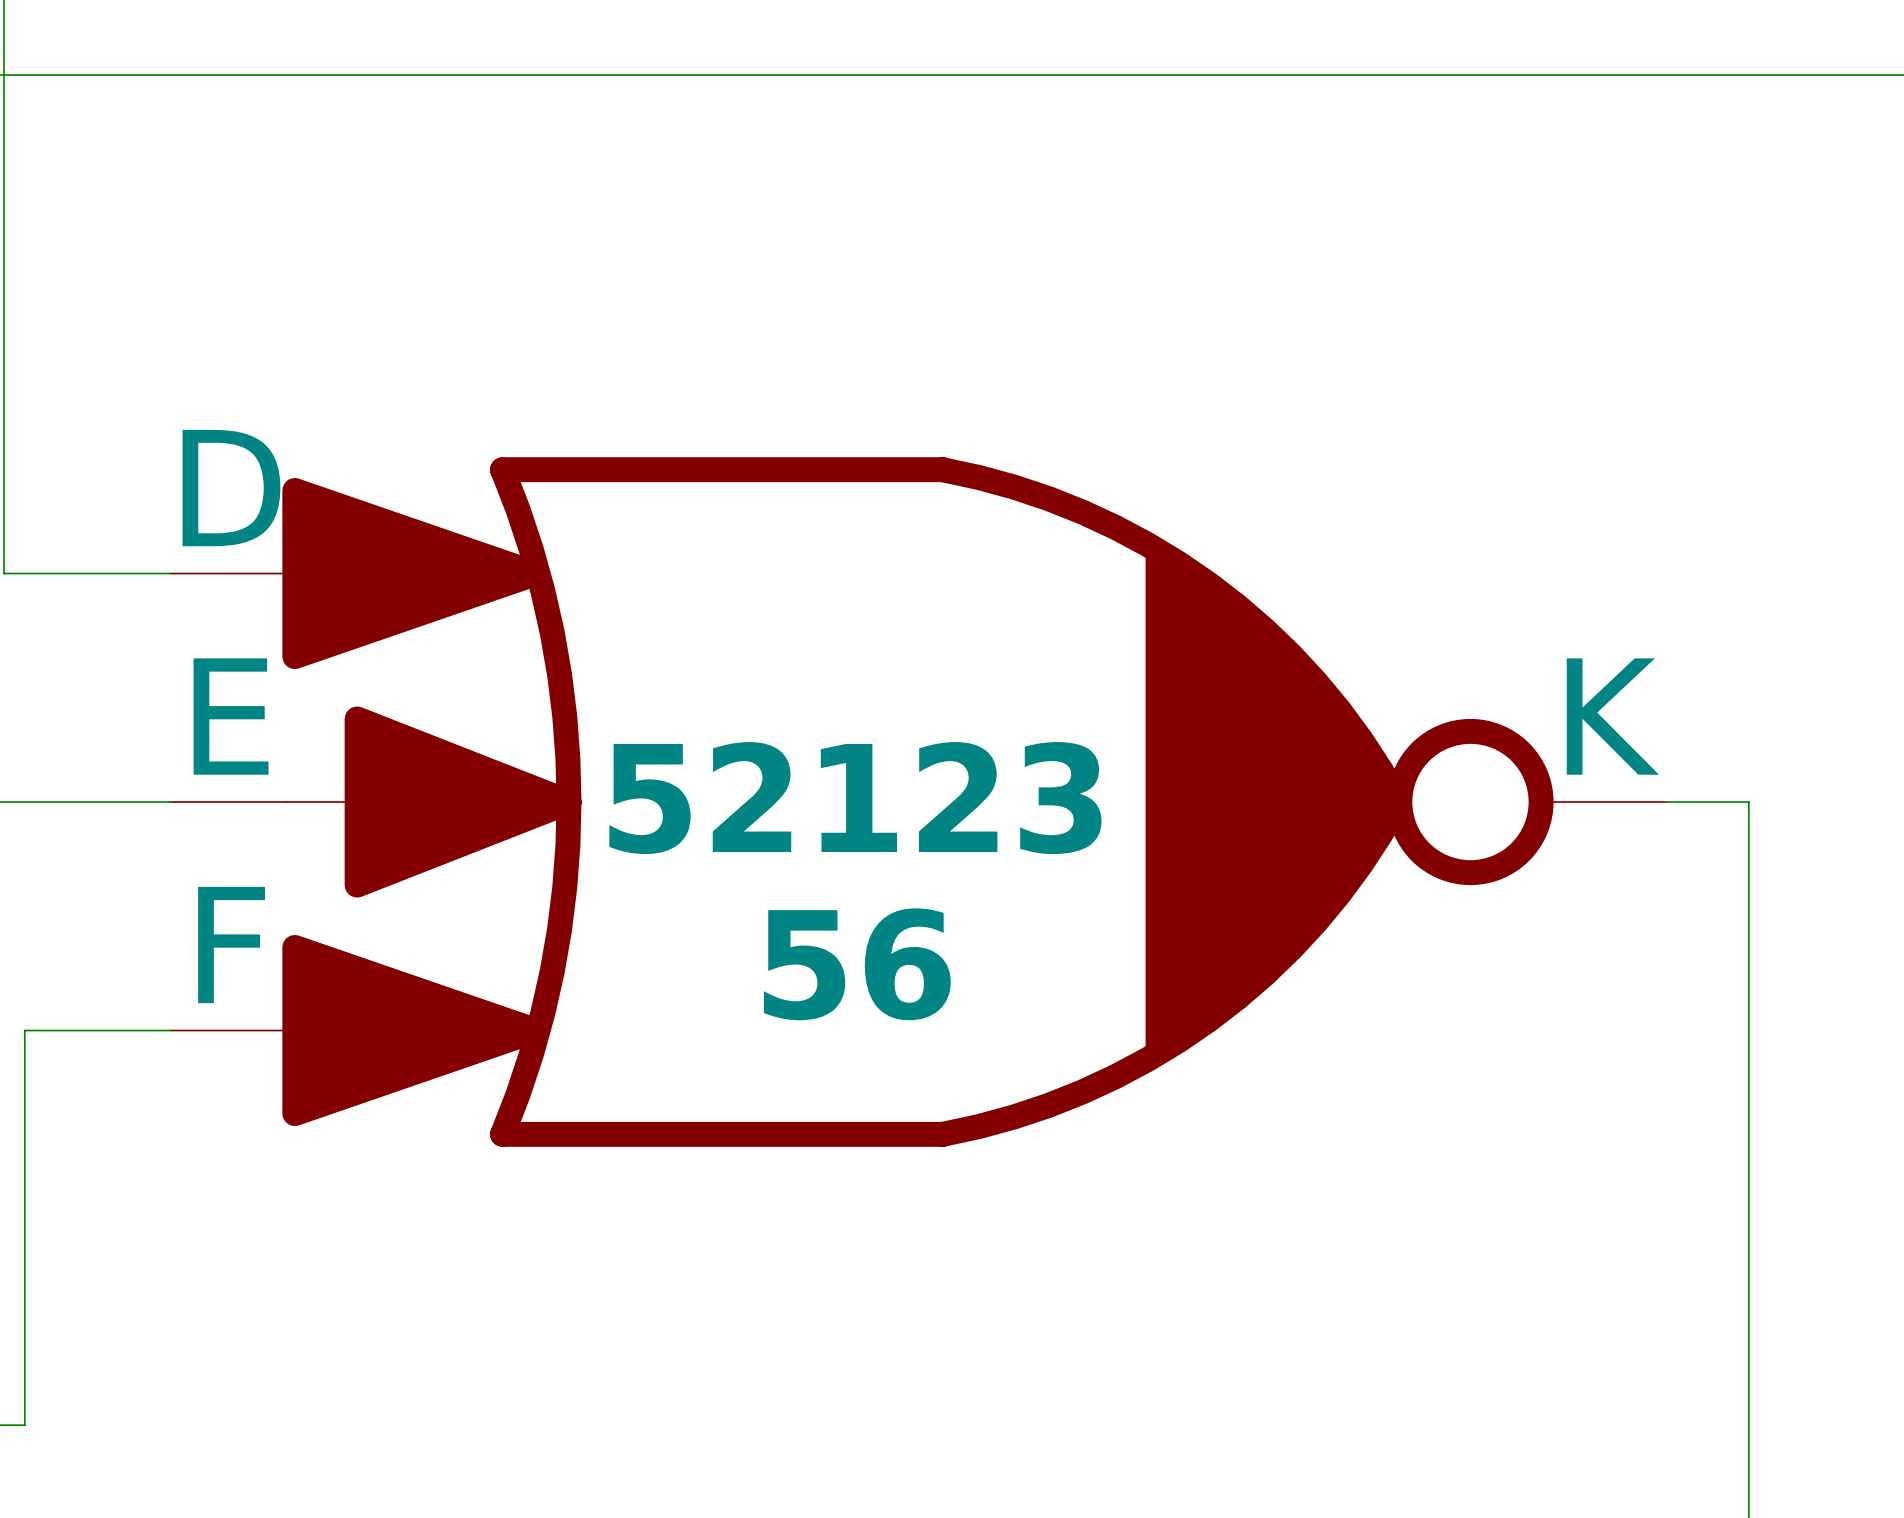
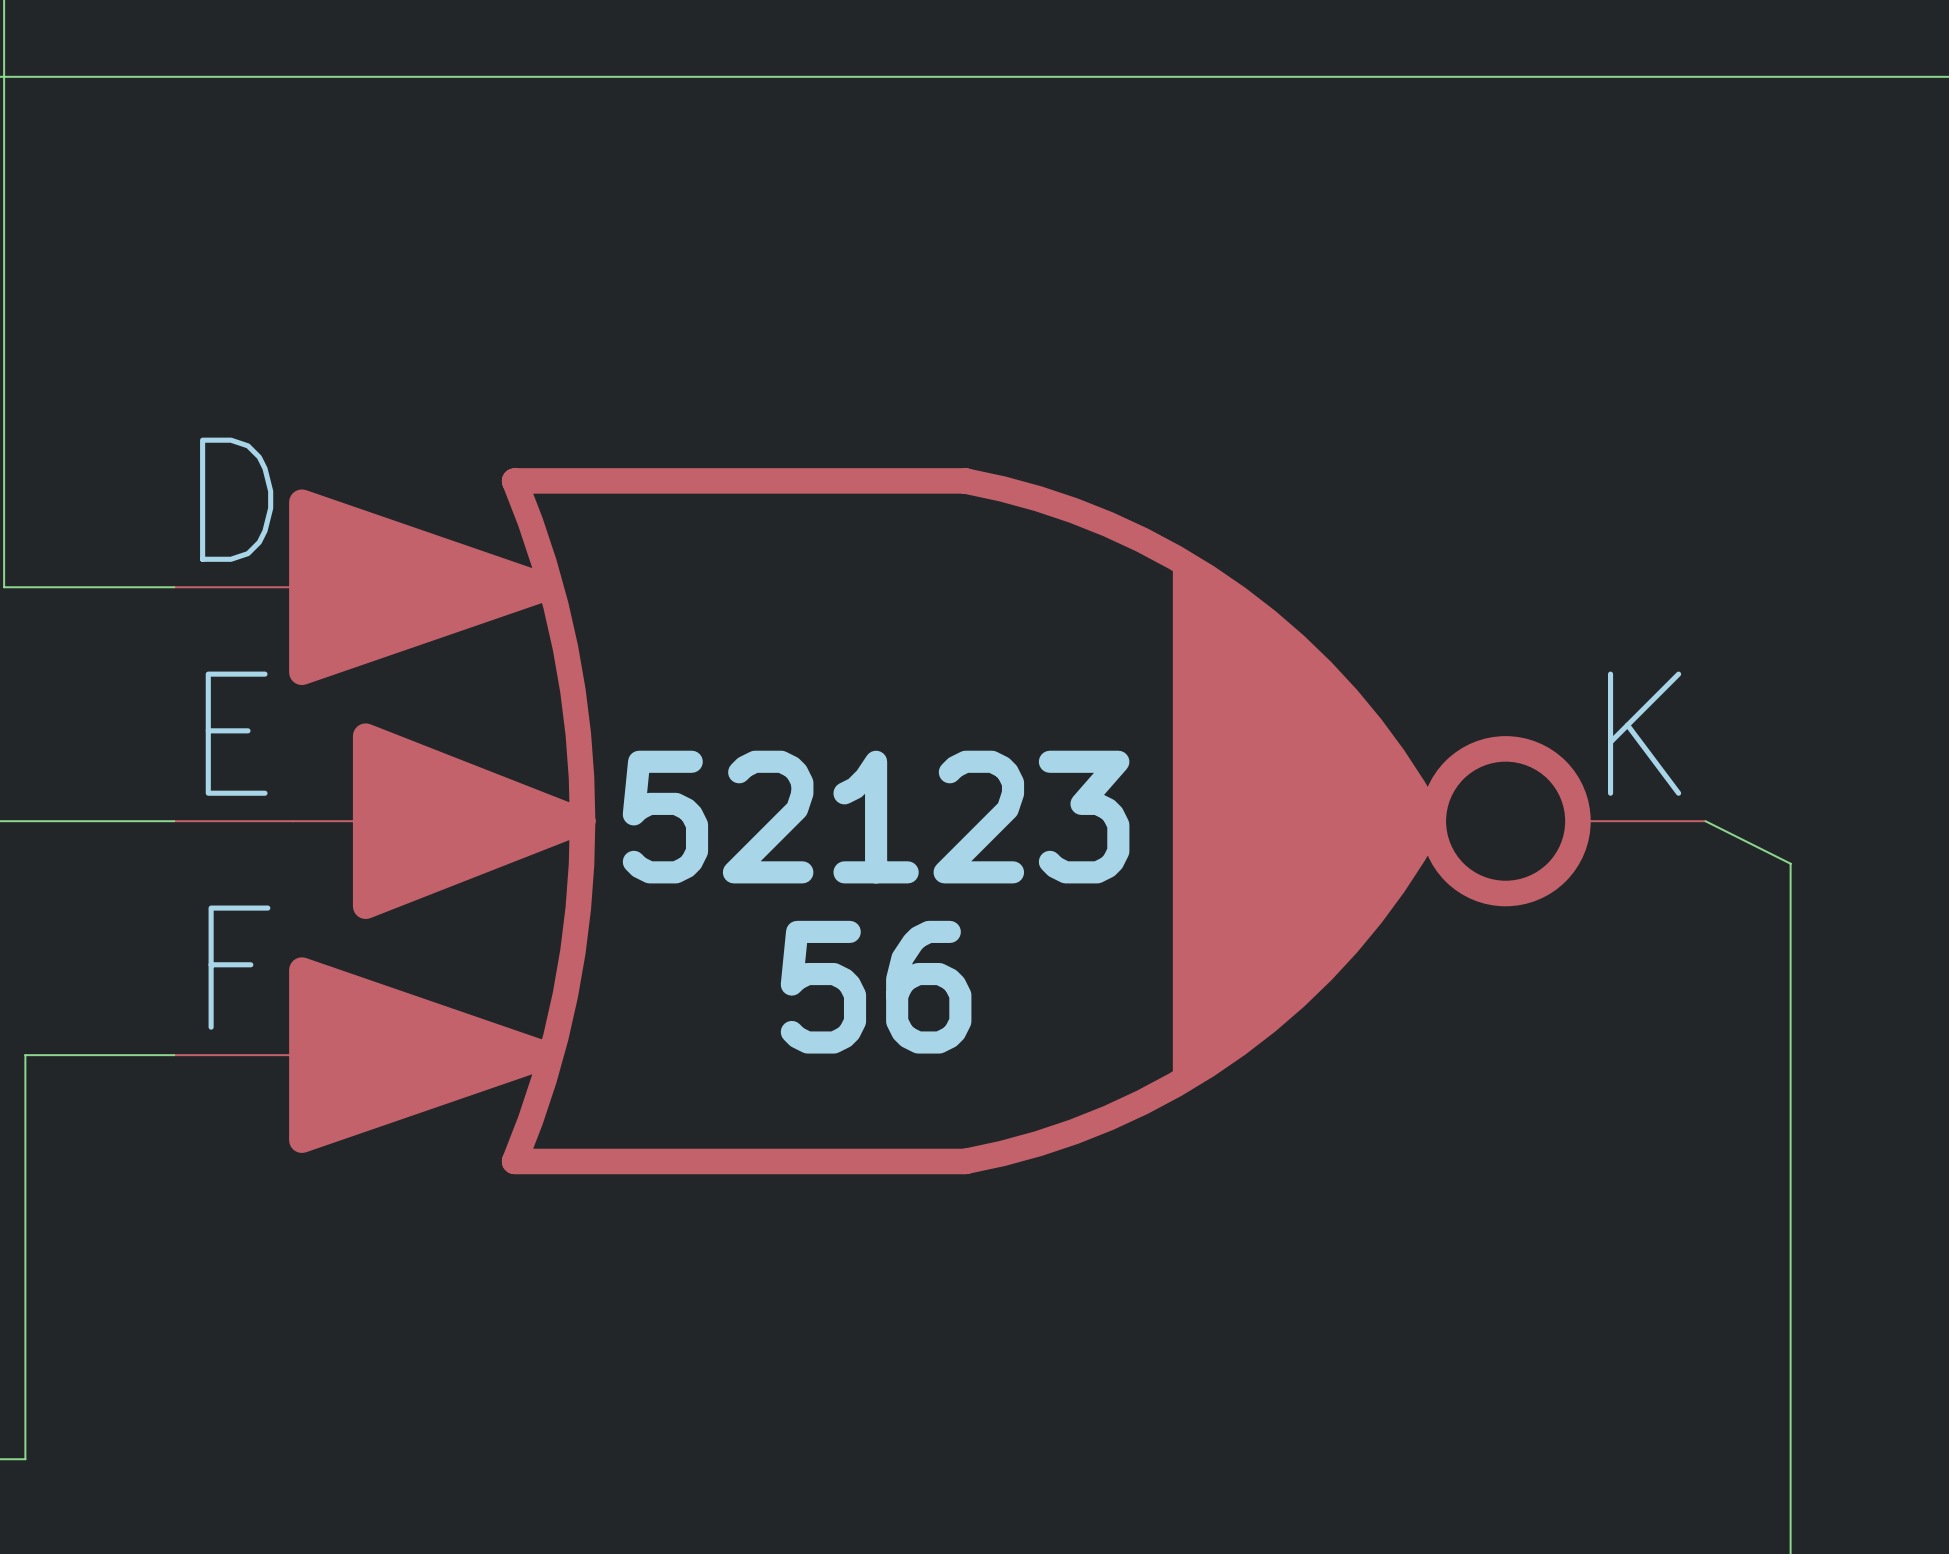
wire: (1665, 802) (1748, 802) (1748, 843) -> (1705, 821) (1790, 863)

